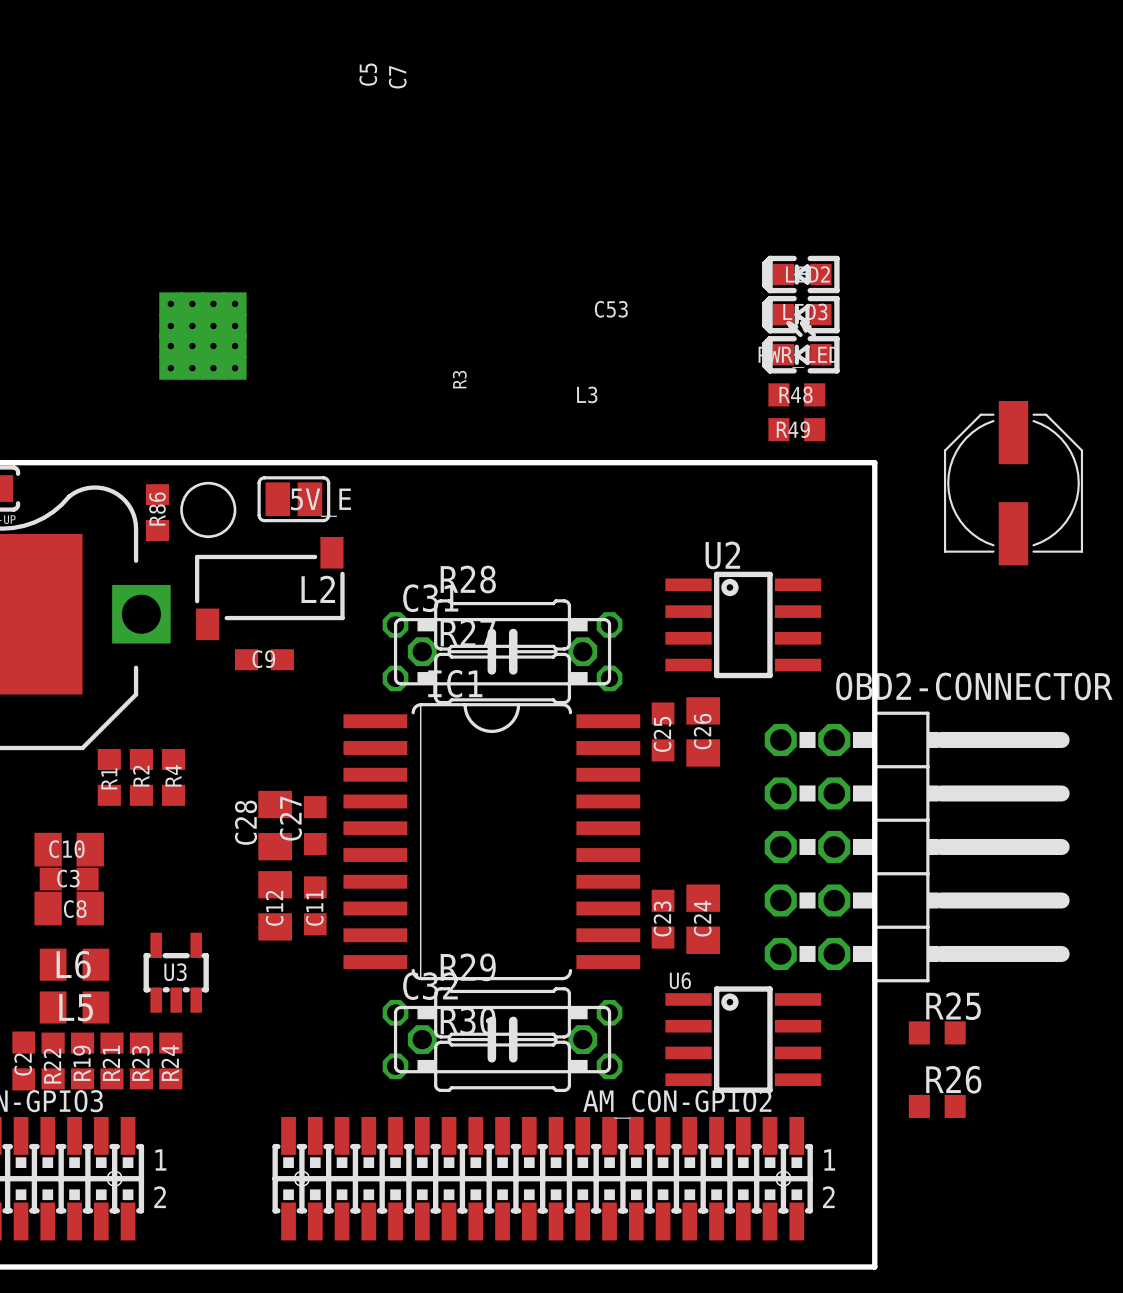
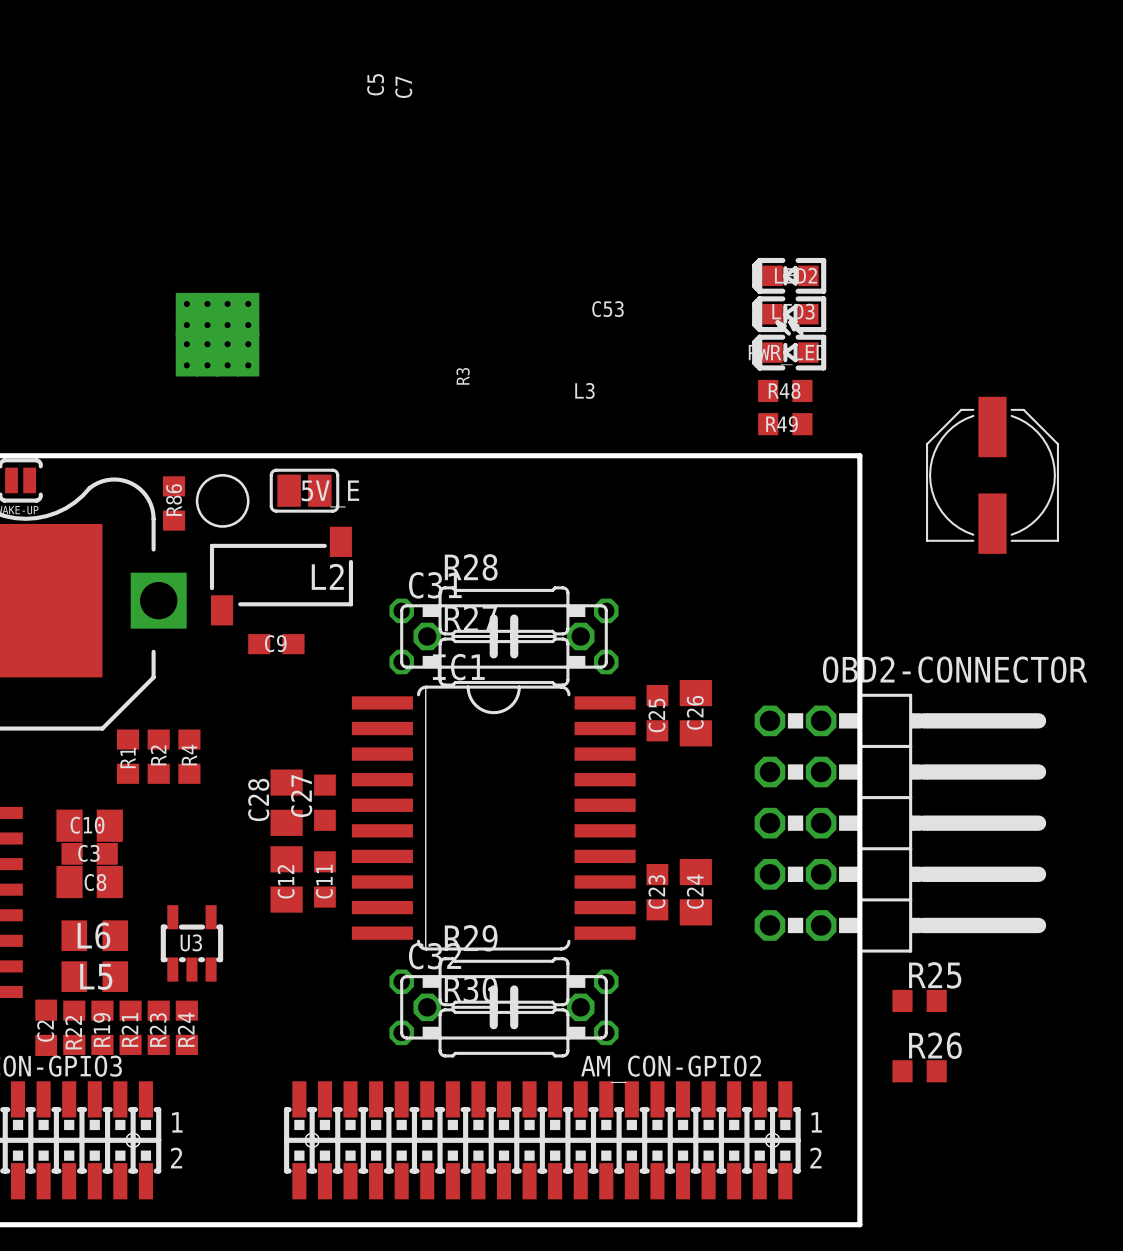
U2: (743, 624) -> none
U6: (743, 1039) -> none

